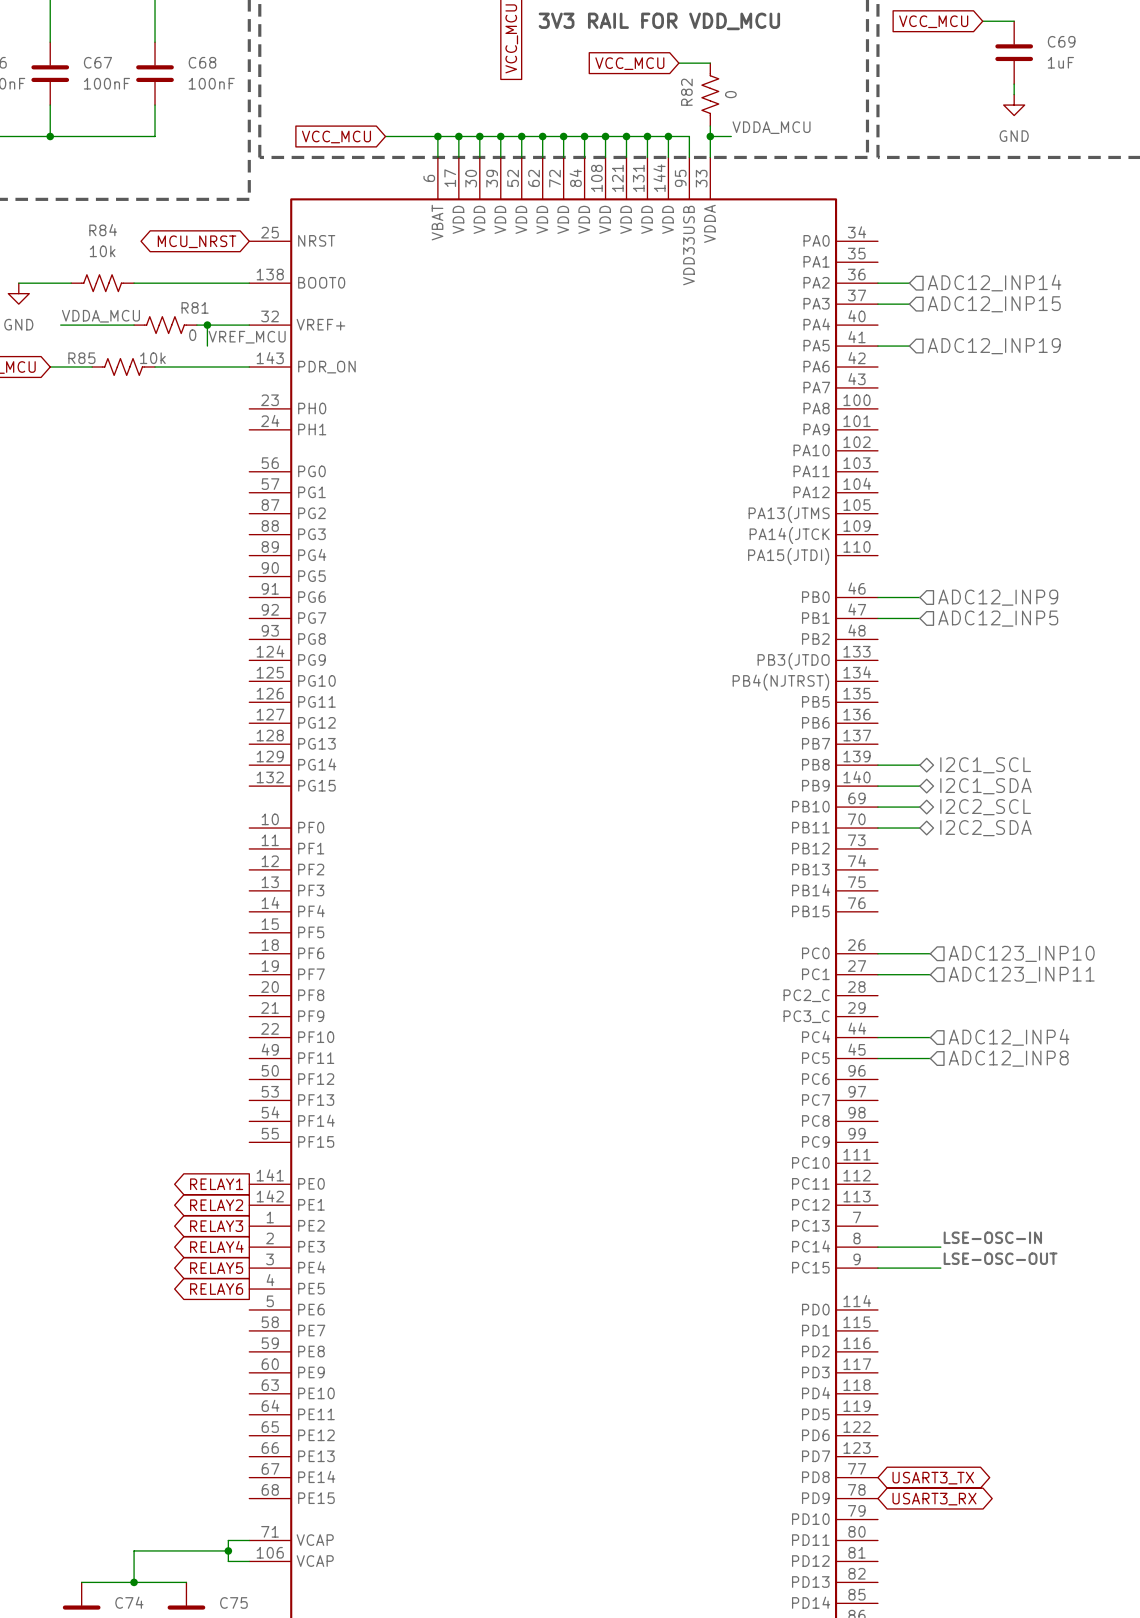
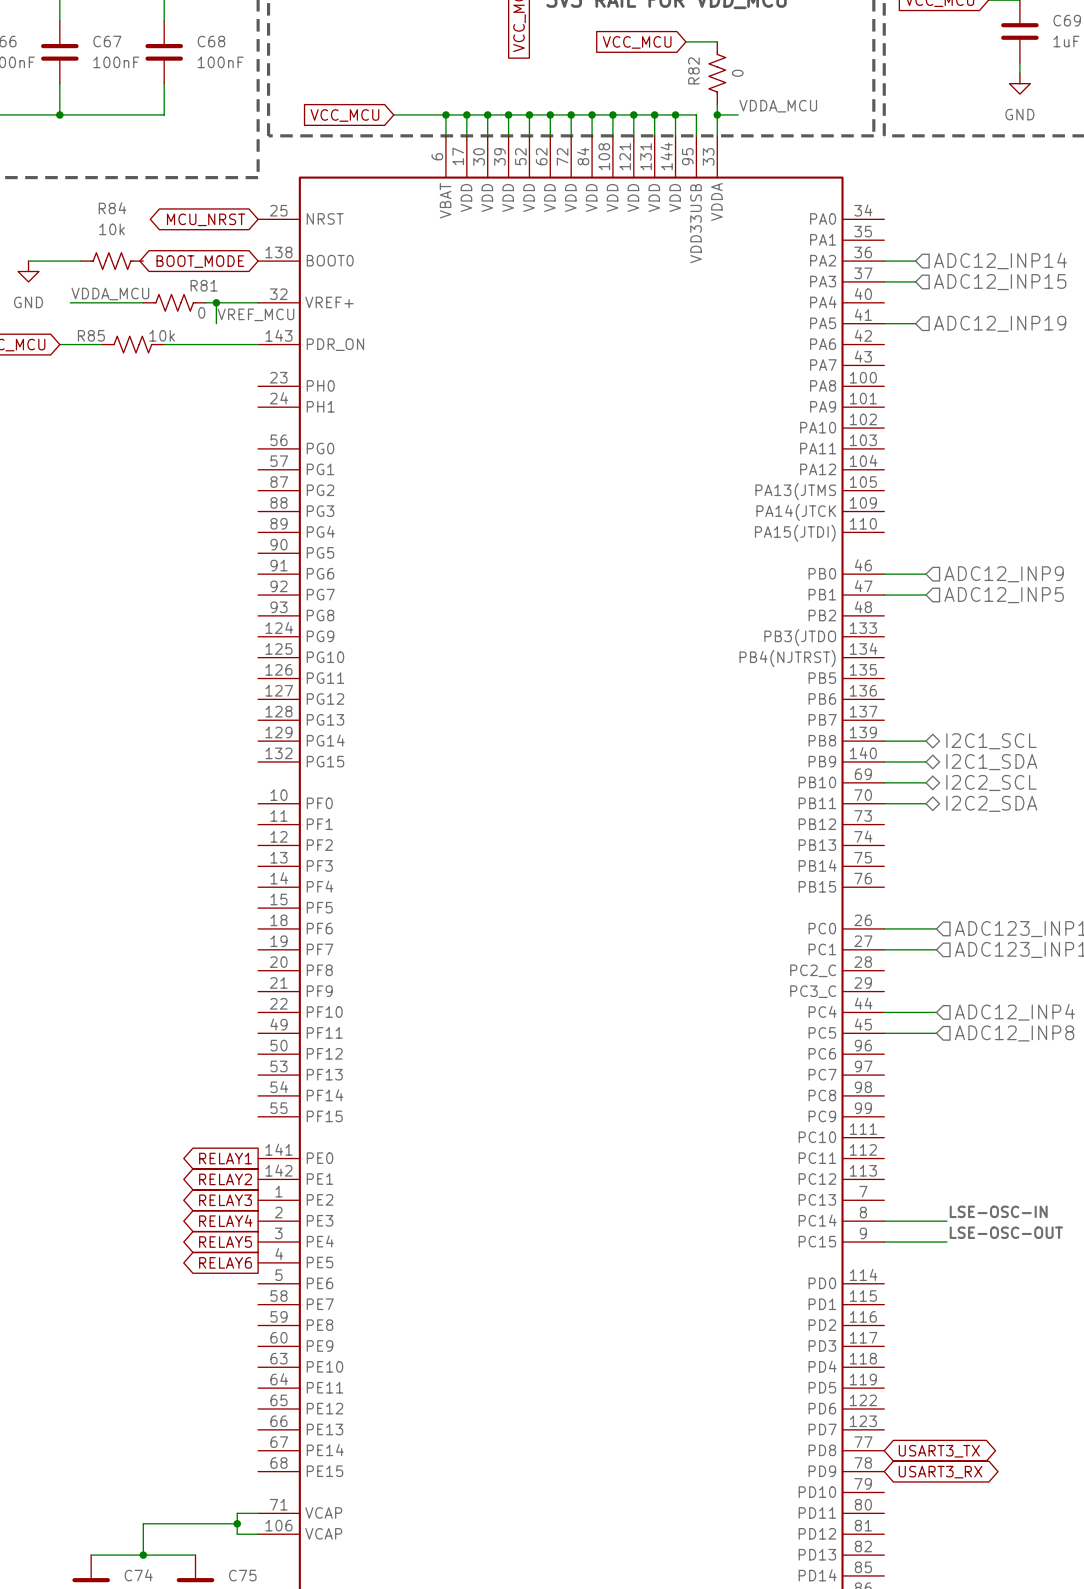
wire: (134, 283) (249, 283) -> none
global label: none -> BOOT_MODE (200, 261)

